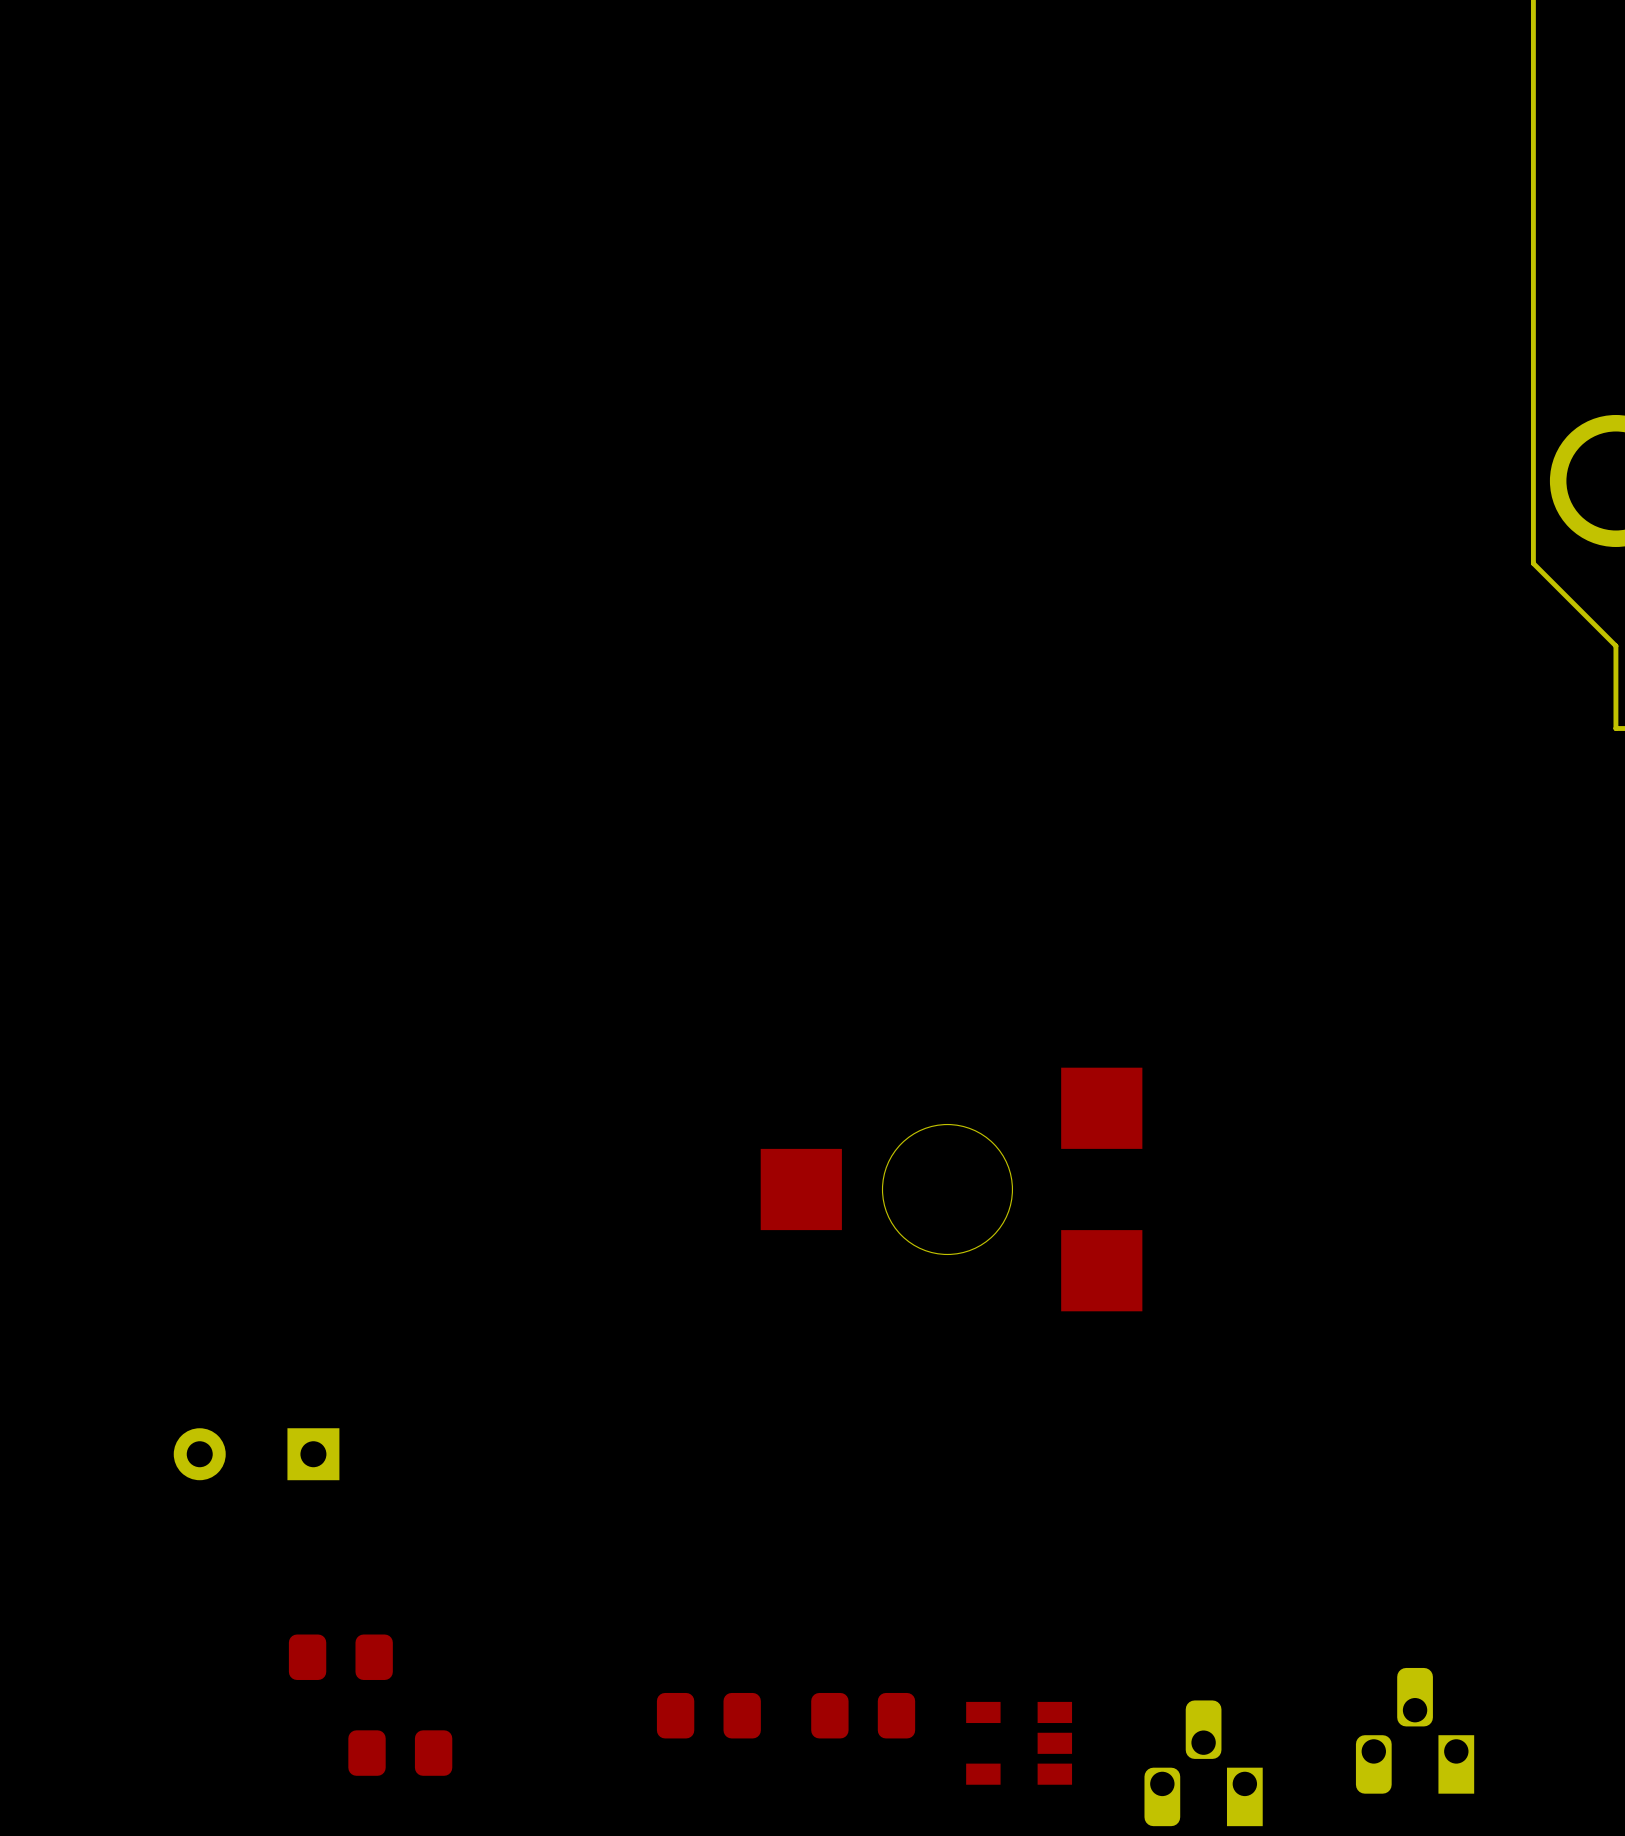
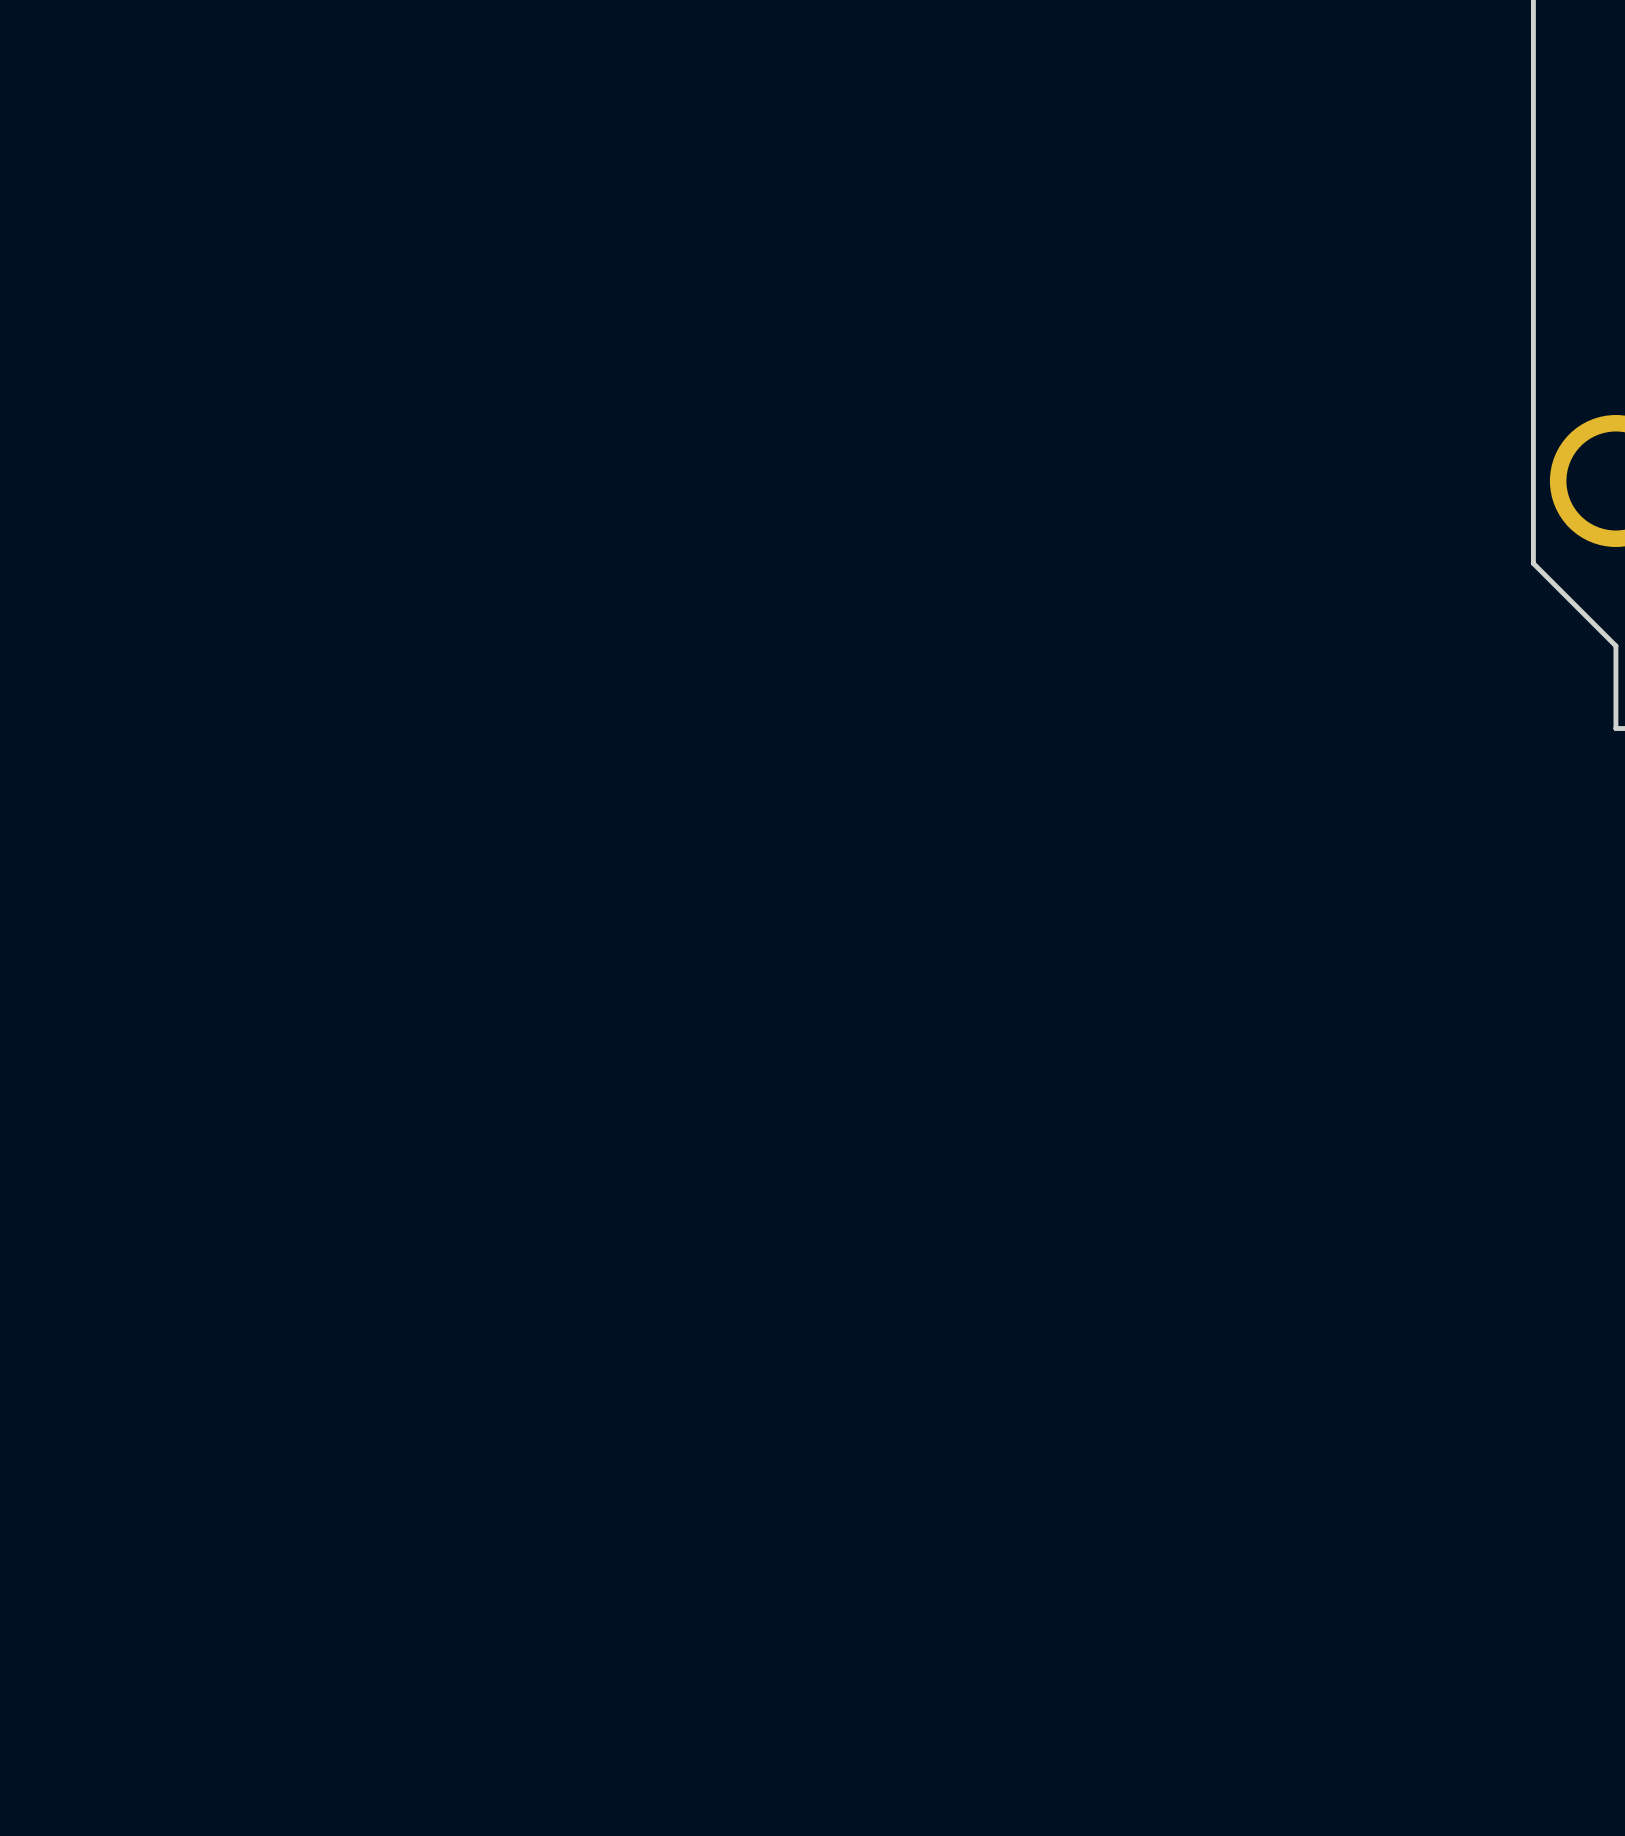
part: (951, 1189) -> none
part: (256, 1454) -> none
part: (340, 1657) -> none
part: (708, 1715) -> none
part: (863, 1715) -> none
part: (1415, 1730) -> none
part: (1019, 1743) -> none
part: (400, 1753) -> none
part: (1203, 1763) -> none

